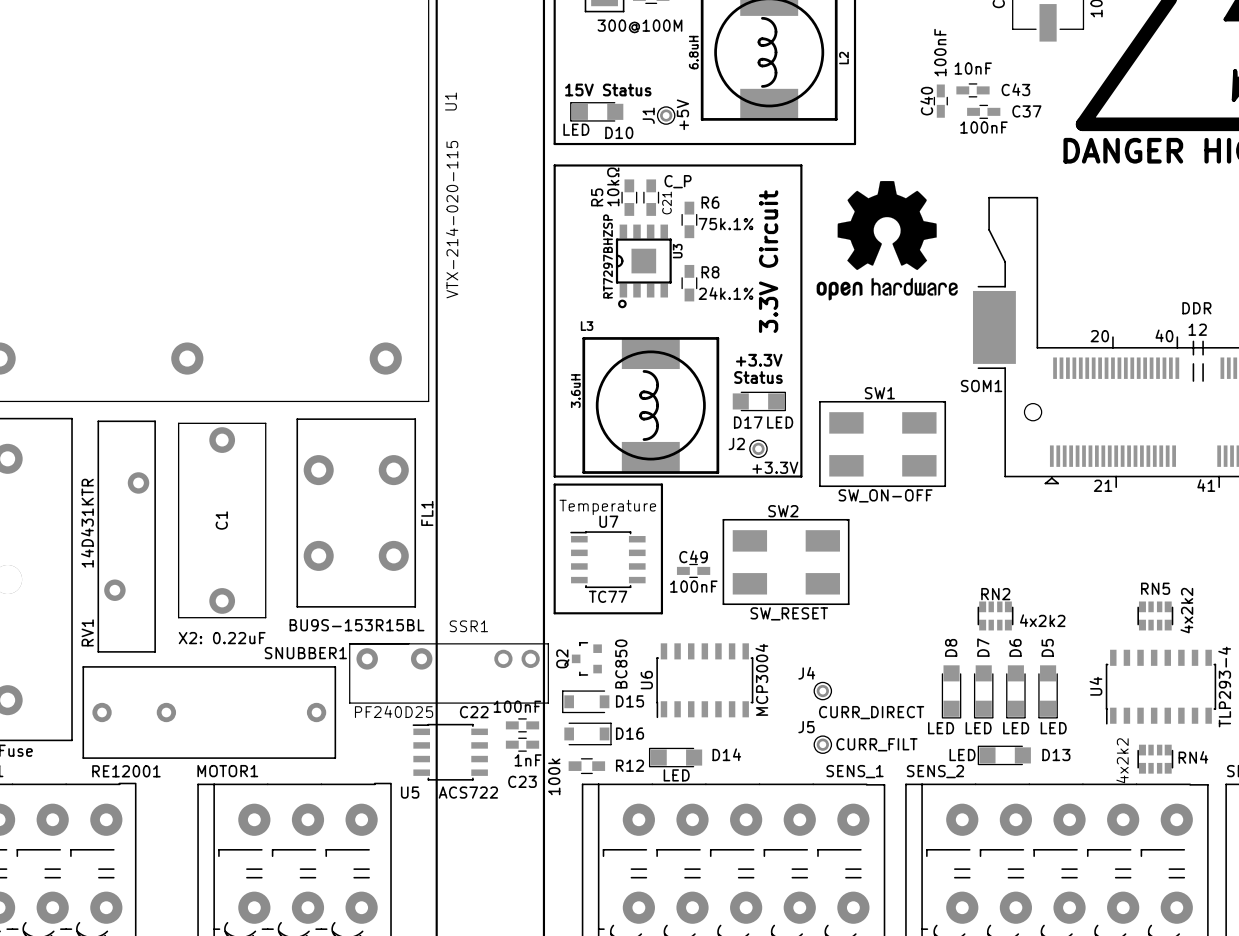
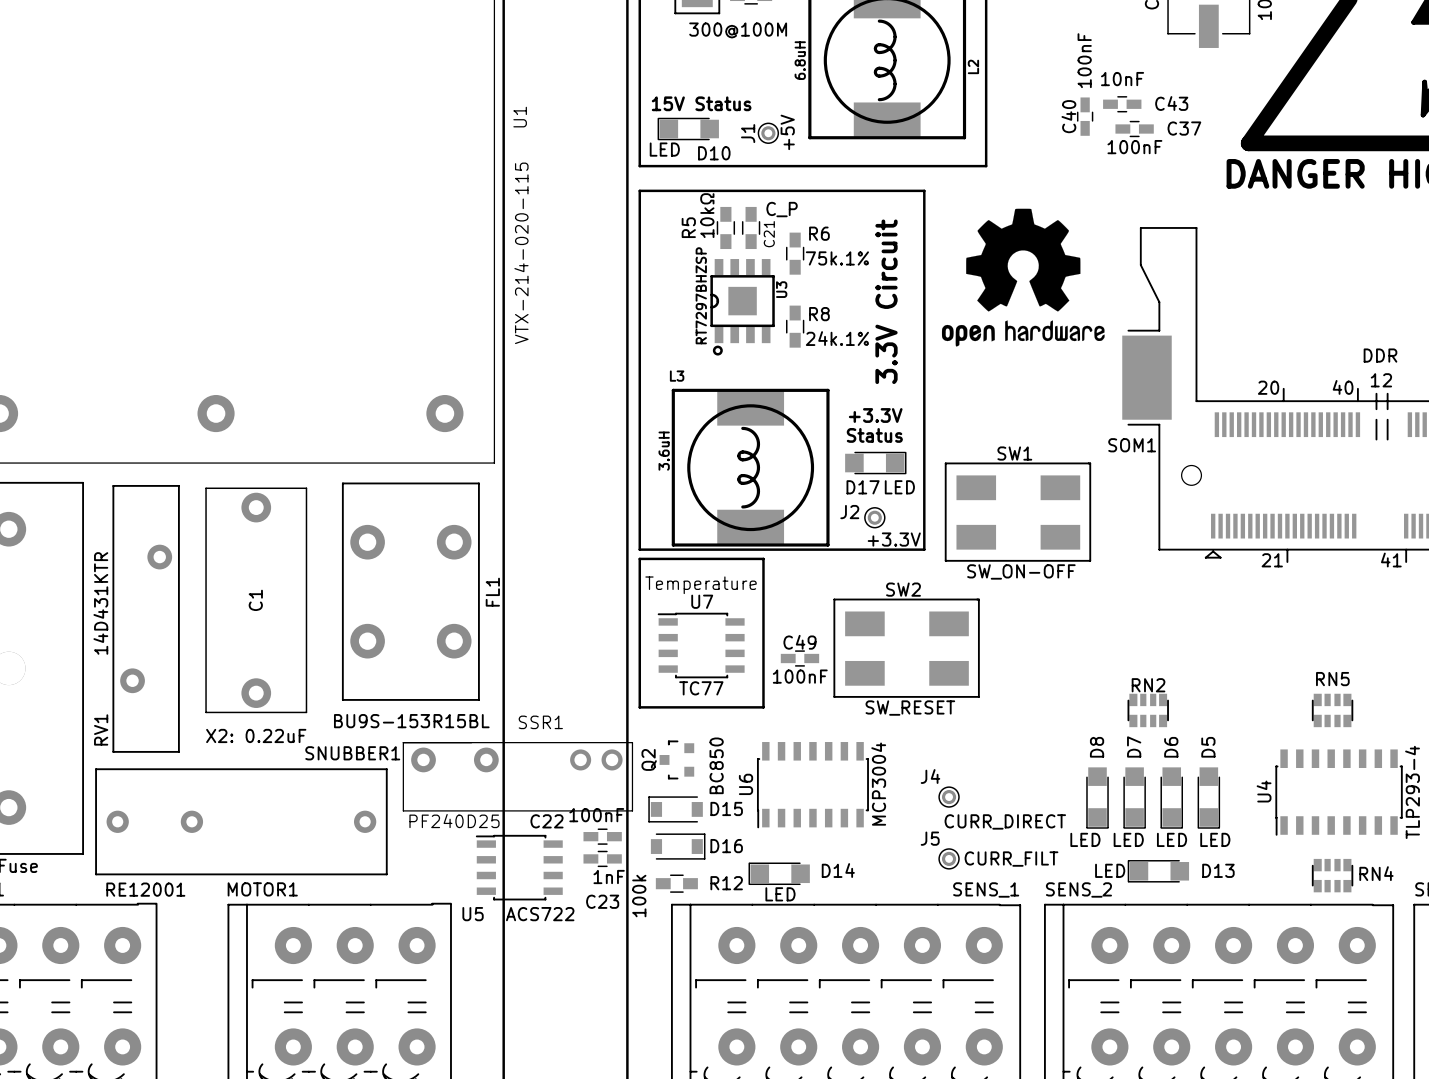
RN5 value: 4x2k2 (1186, 610) -> none
RN2 value: 4x2k2 (1042, 620) -> none
RN4 value: 4x2k2 (1122, 760) -> none

